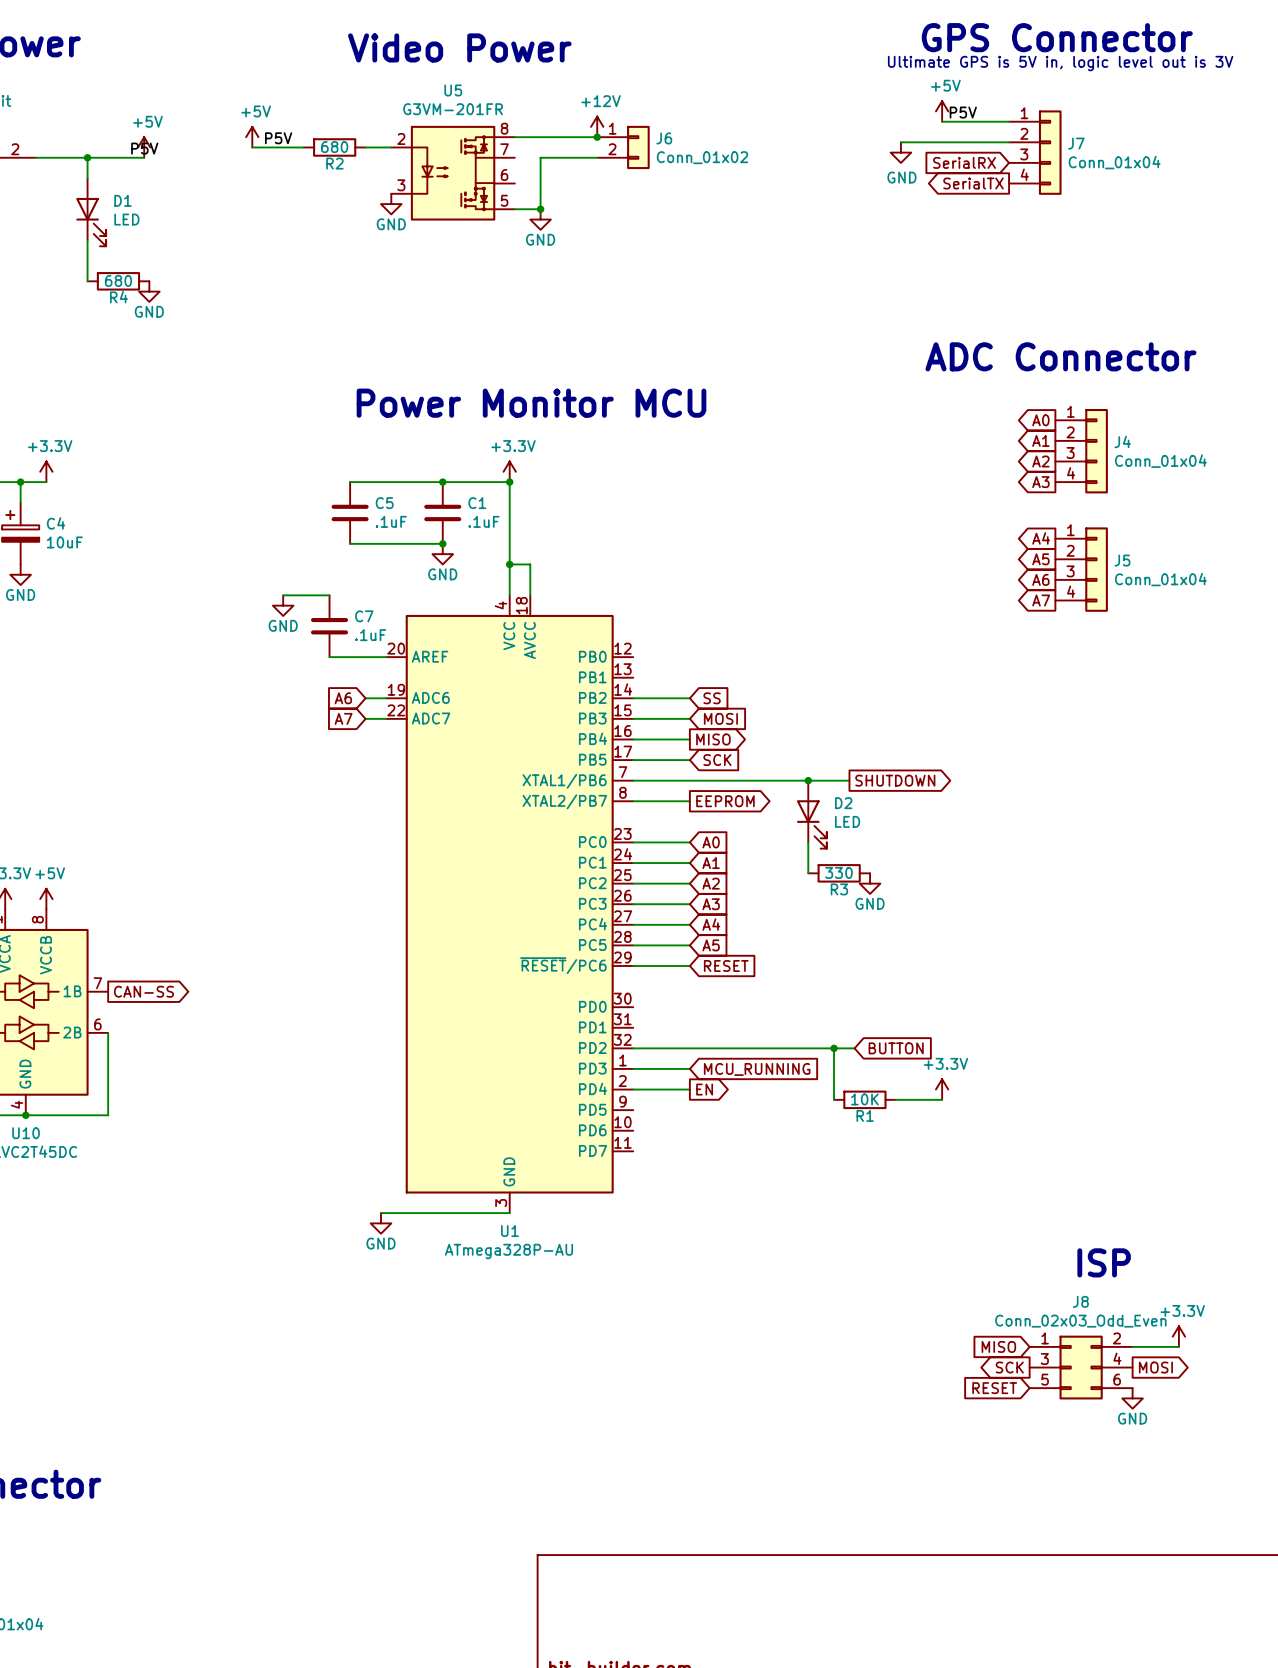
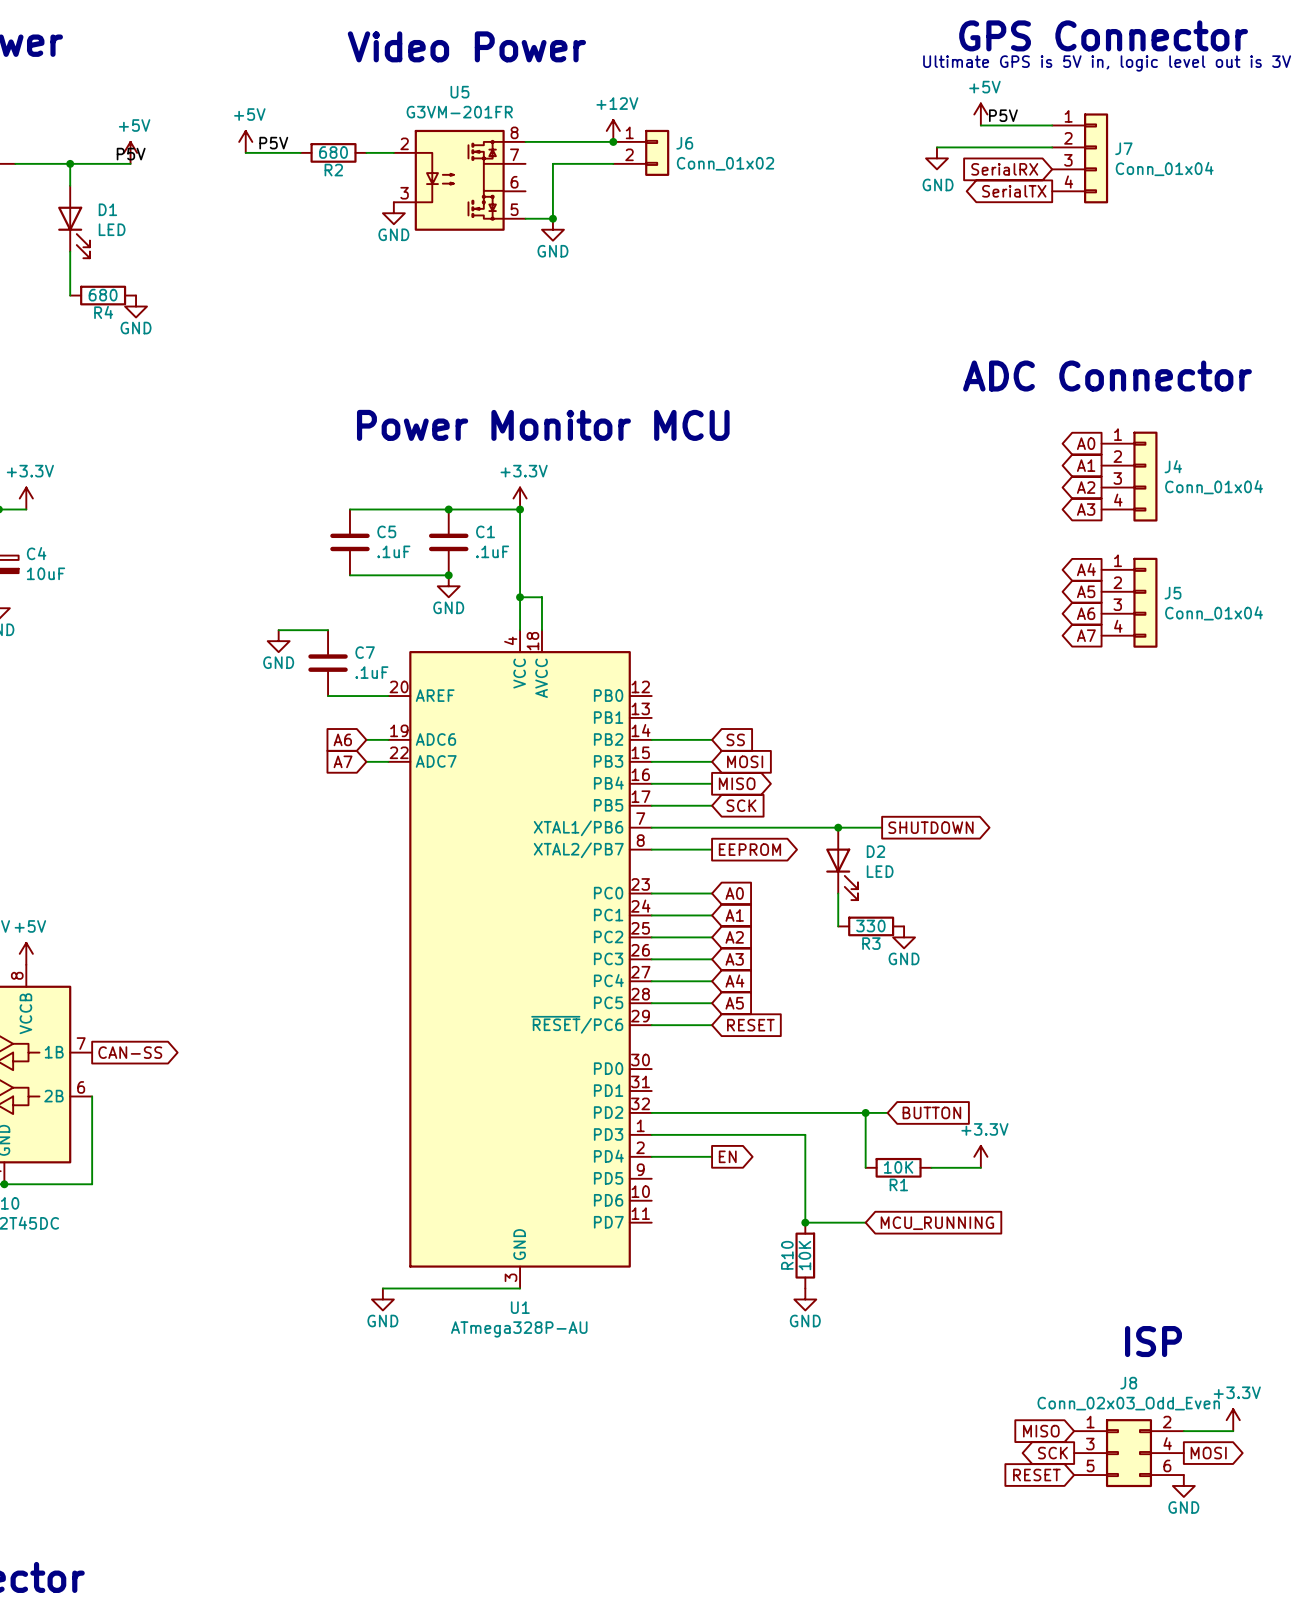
wire: none -> (712, 1134) (805, 1134) (805, 1222) (865, 1222)
global label position: MCU_RUNNING (757, 1069) -> MCU_RUNNING (937, 1223)
junction: none -> (805, 1222)
R10: none -> 10K (805, 1255)
power symbol: none -> GND (805, 1299)

